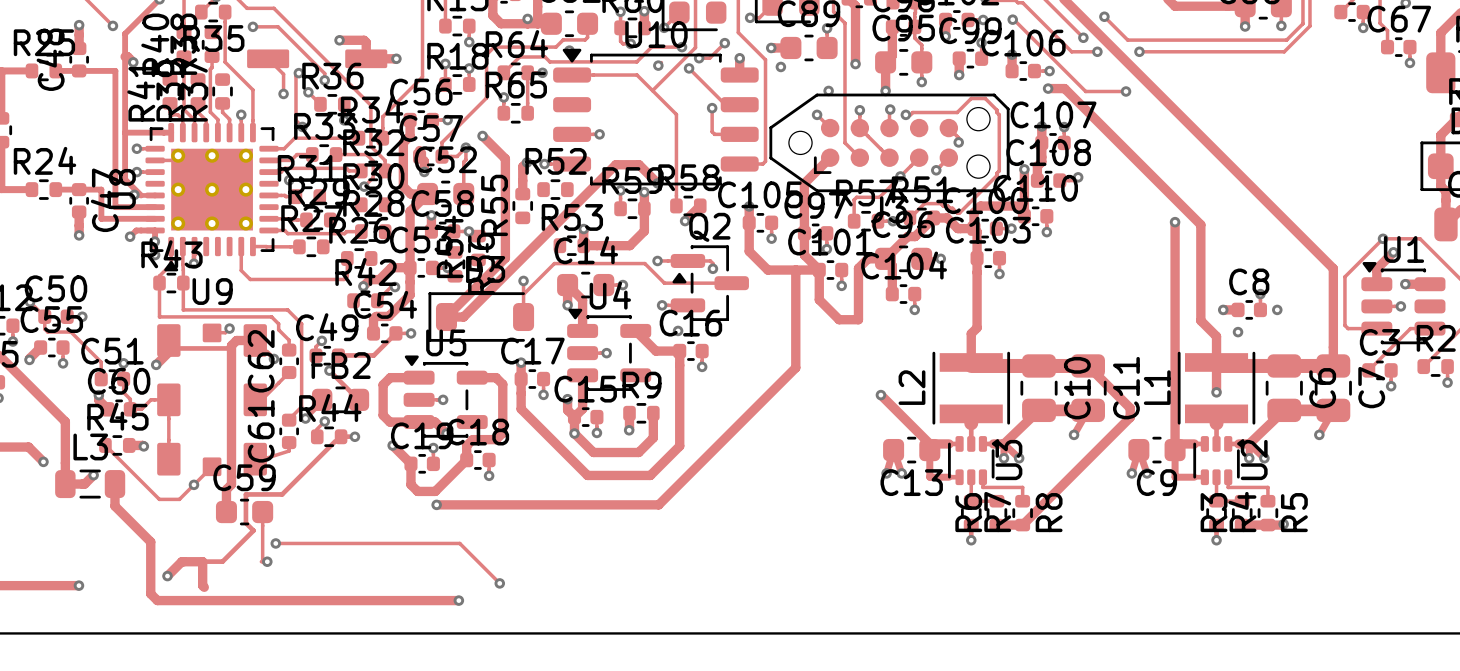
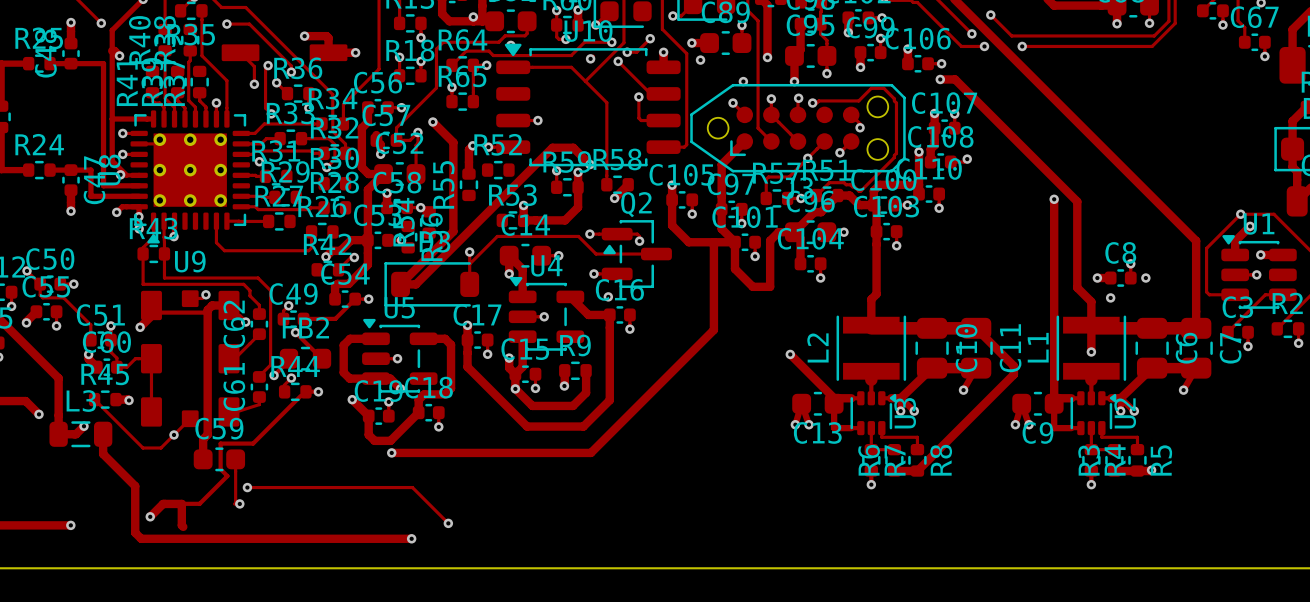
via: (1012, 19) -> none
track: (1013, 19) (1085, 91) (1126, 91) -> none
via: (1126, 91) -> none

